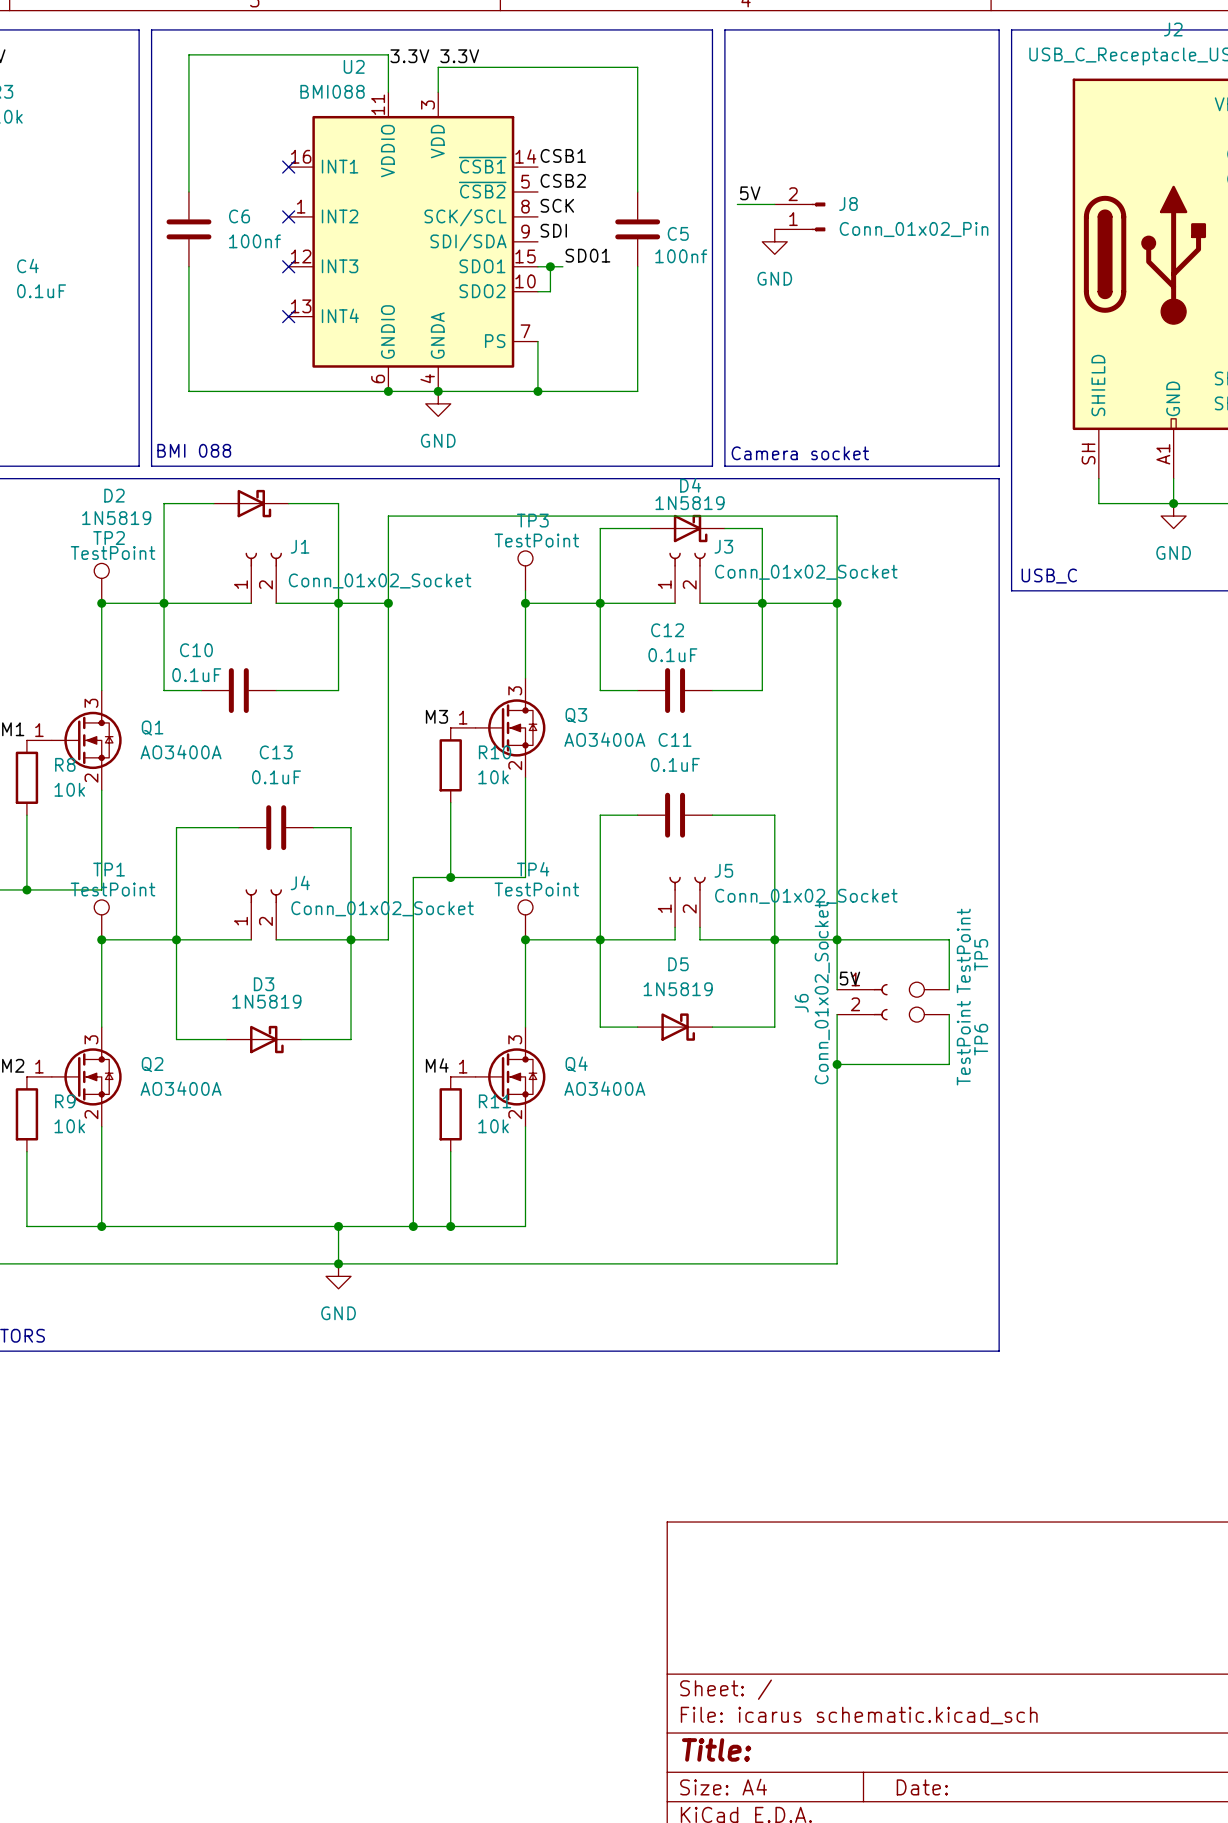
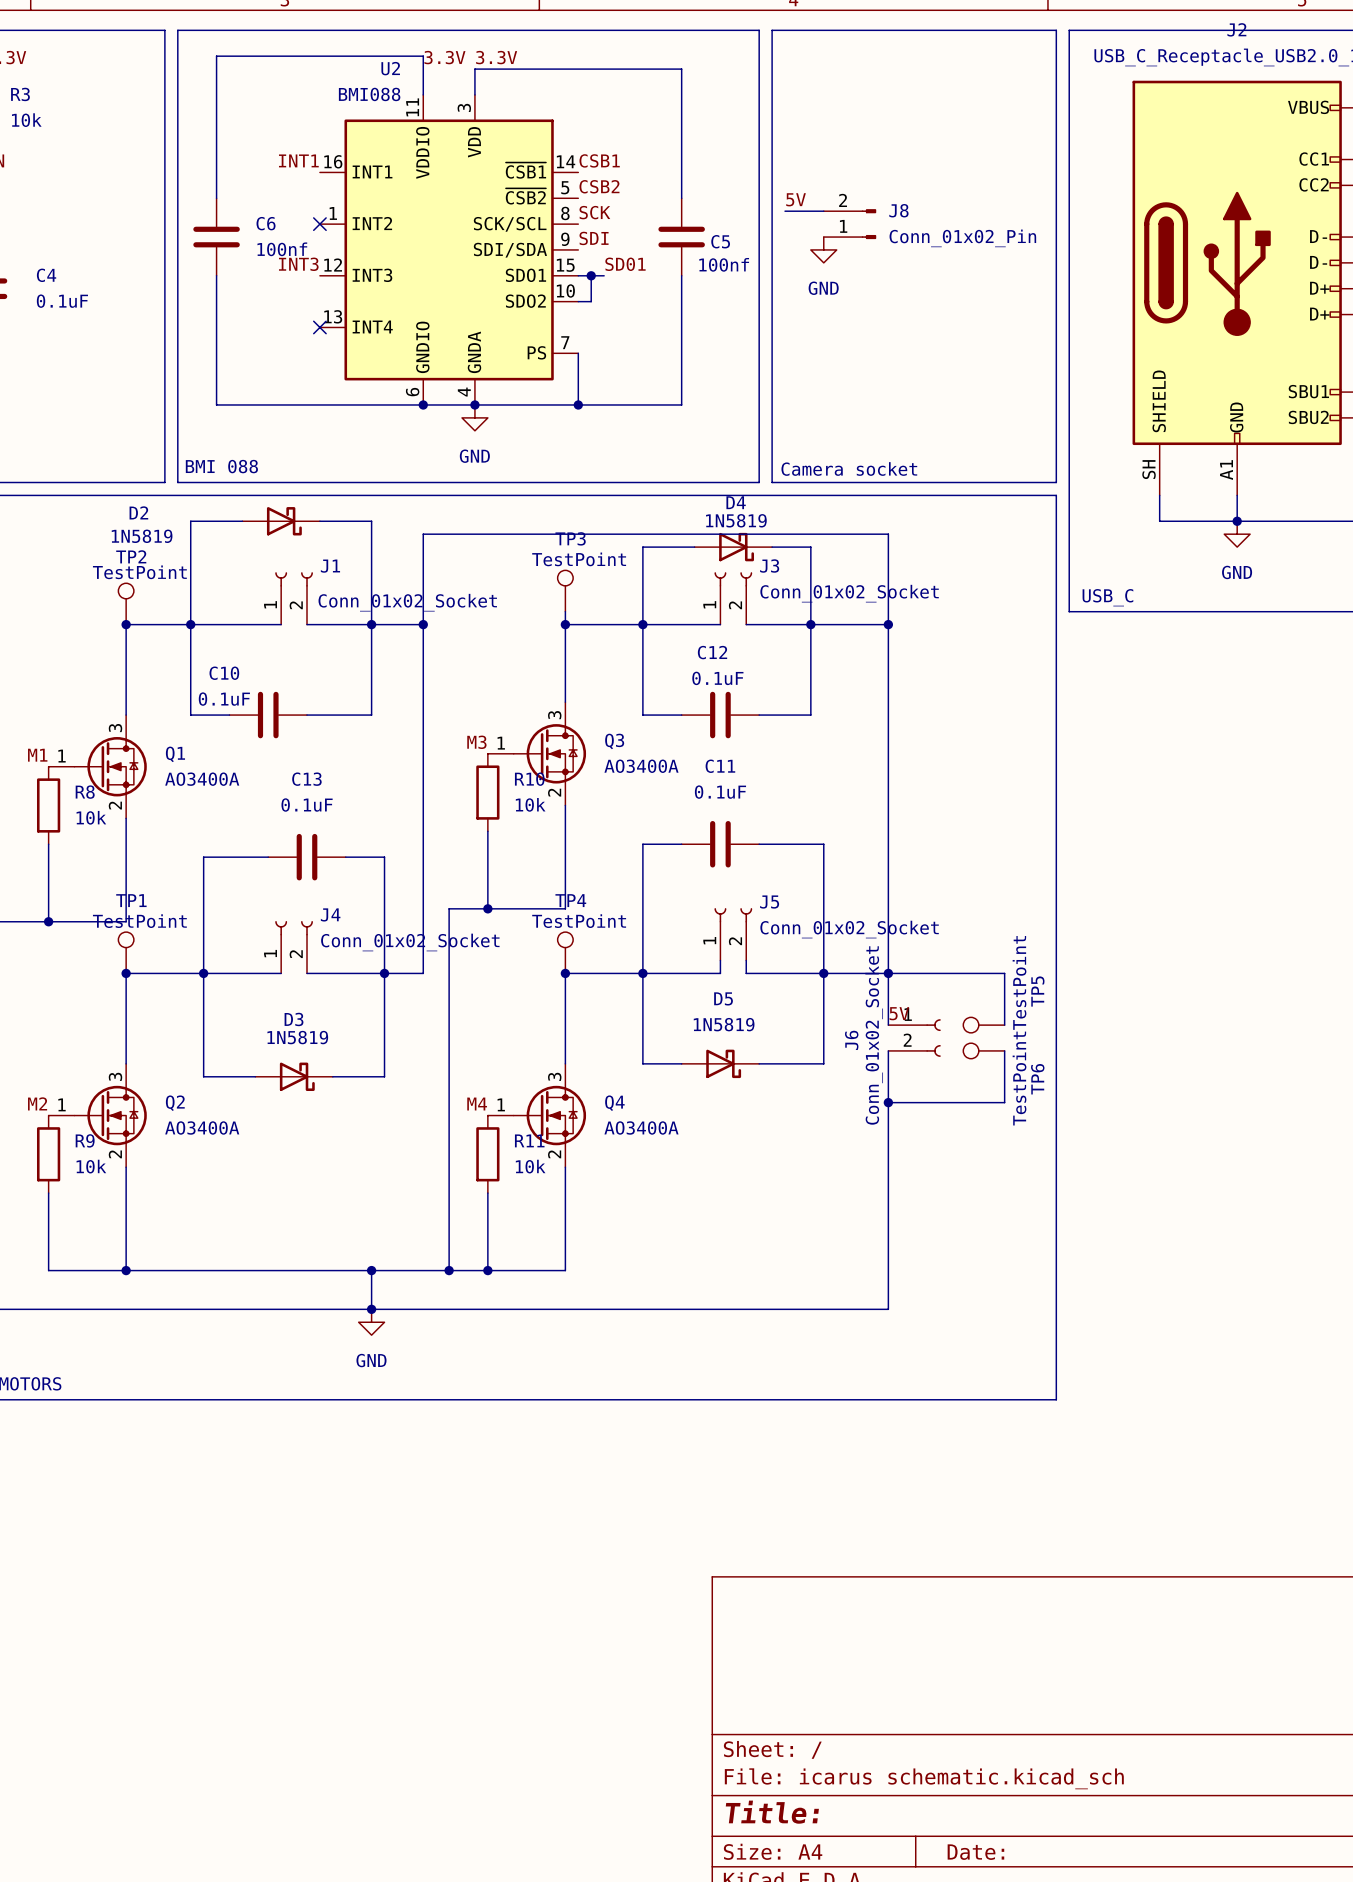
label: none -> INT1 (298, 160)
no-connect mark: (288, 167) -> none
label: none -> INT3 (298, 264)
no-connect mark: (288, 266) -> none

